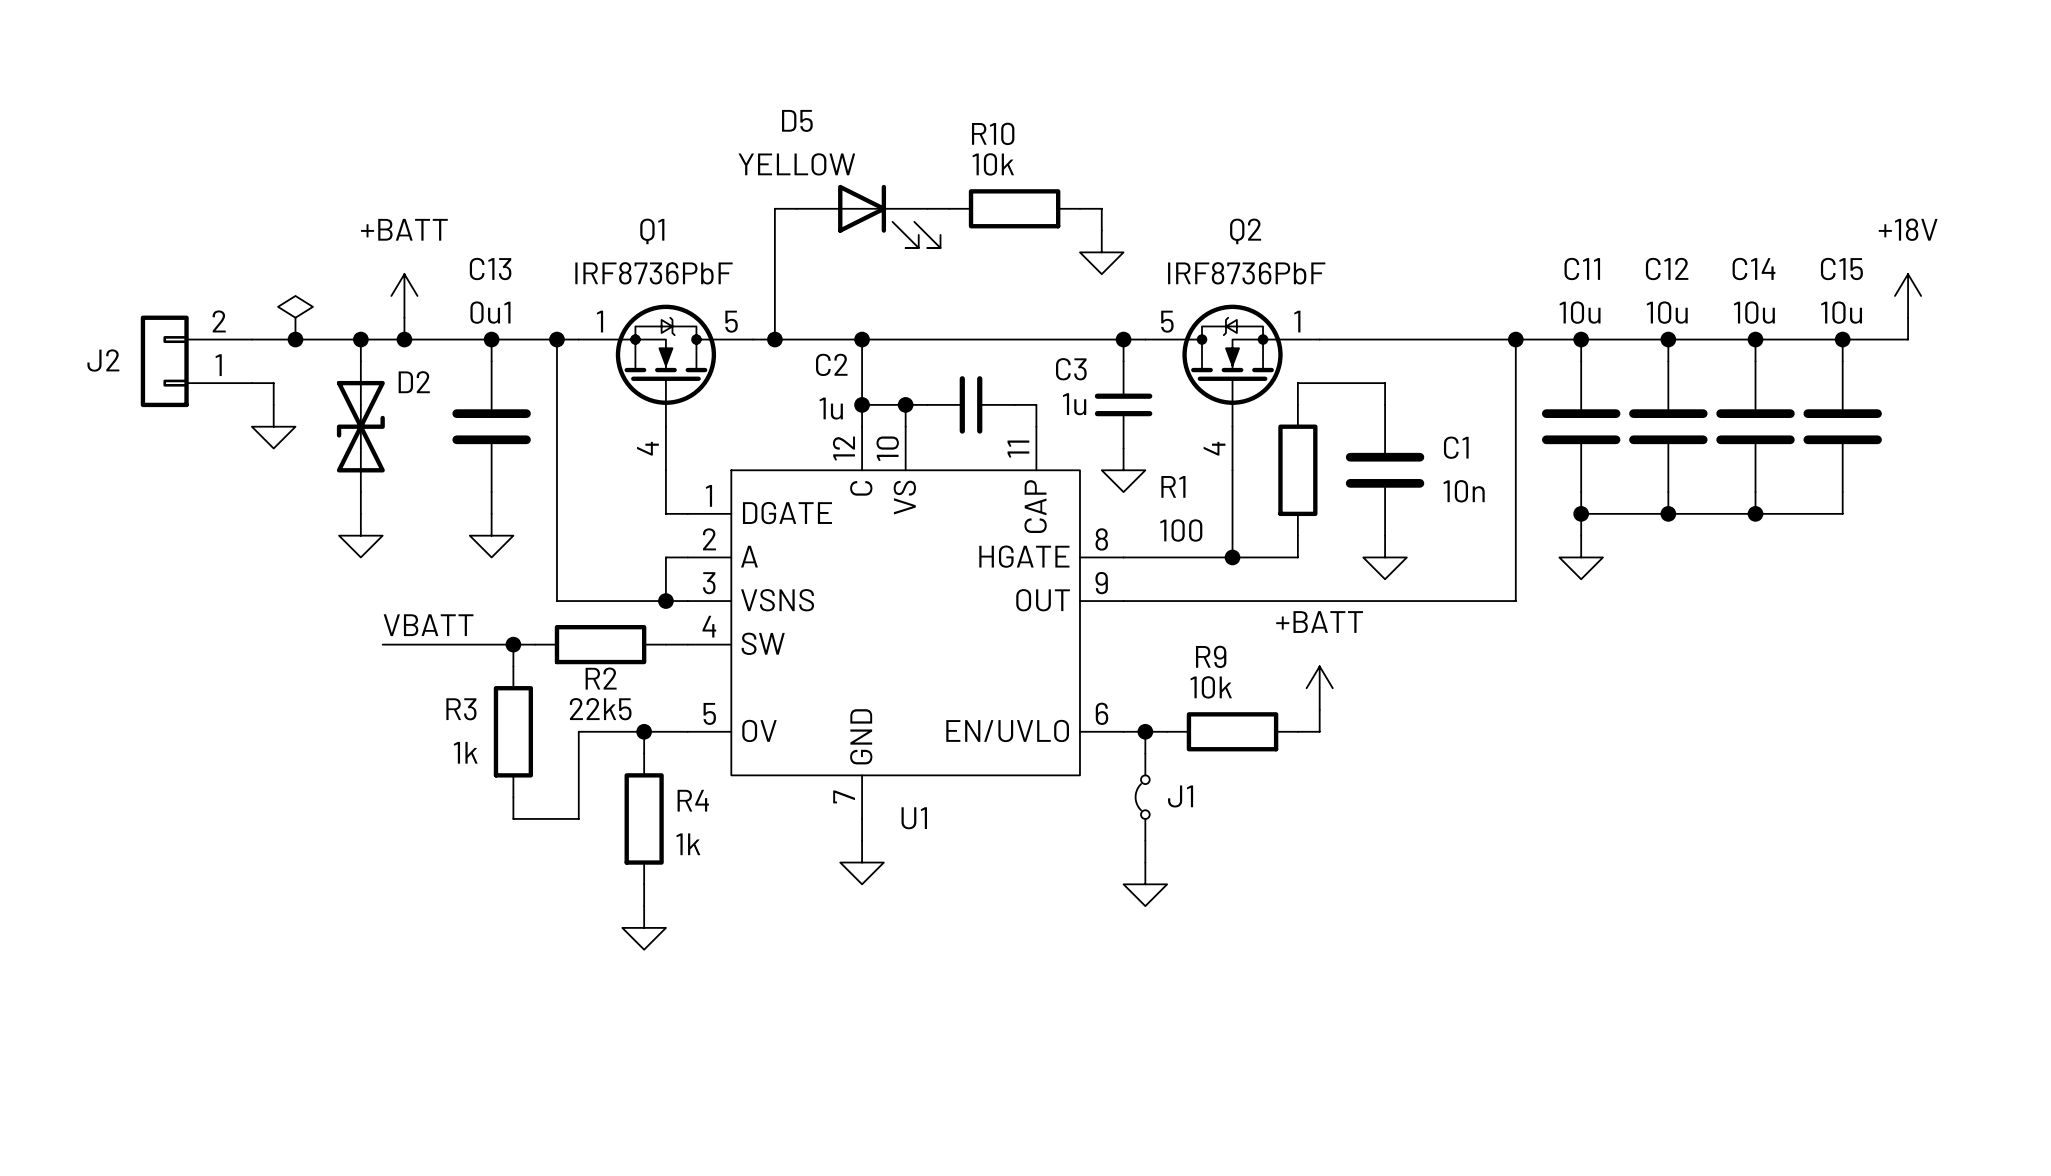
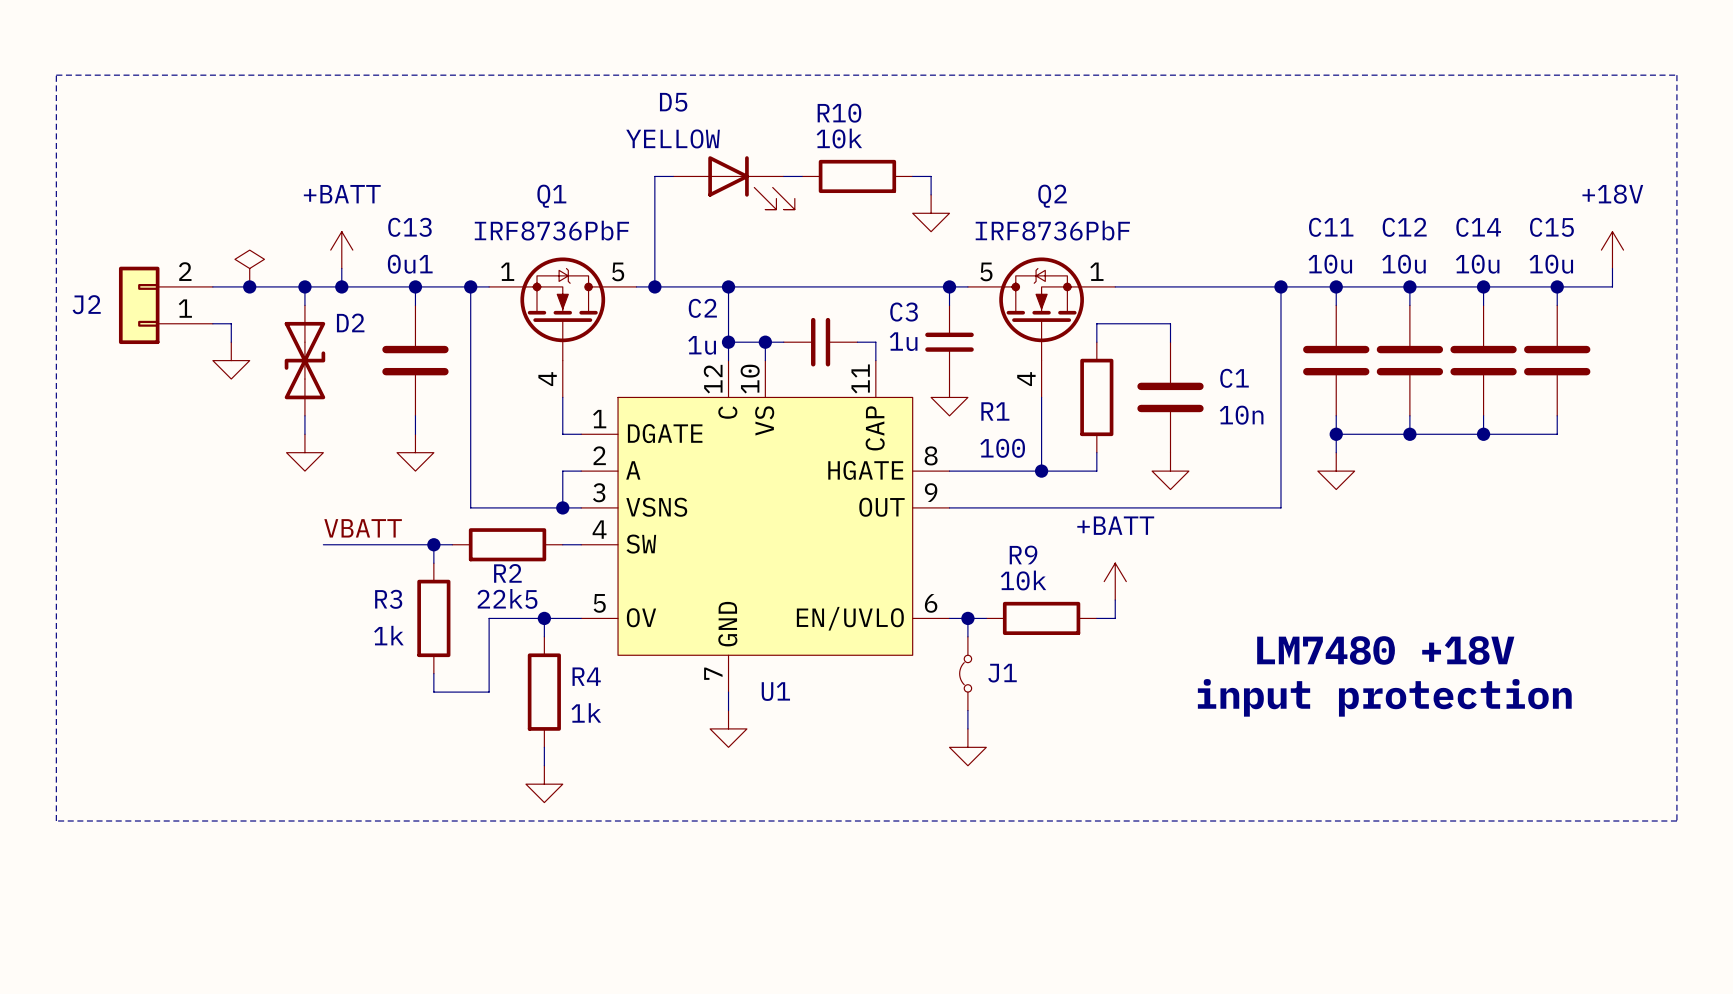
line: none -> (56, 75) (1676, 75) (1676, 821) (56, 821) (56, 75)
text: none -> LM7480 +18V (1385, 650)
text: none -> input protection (1384, 697)

